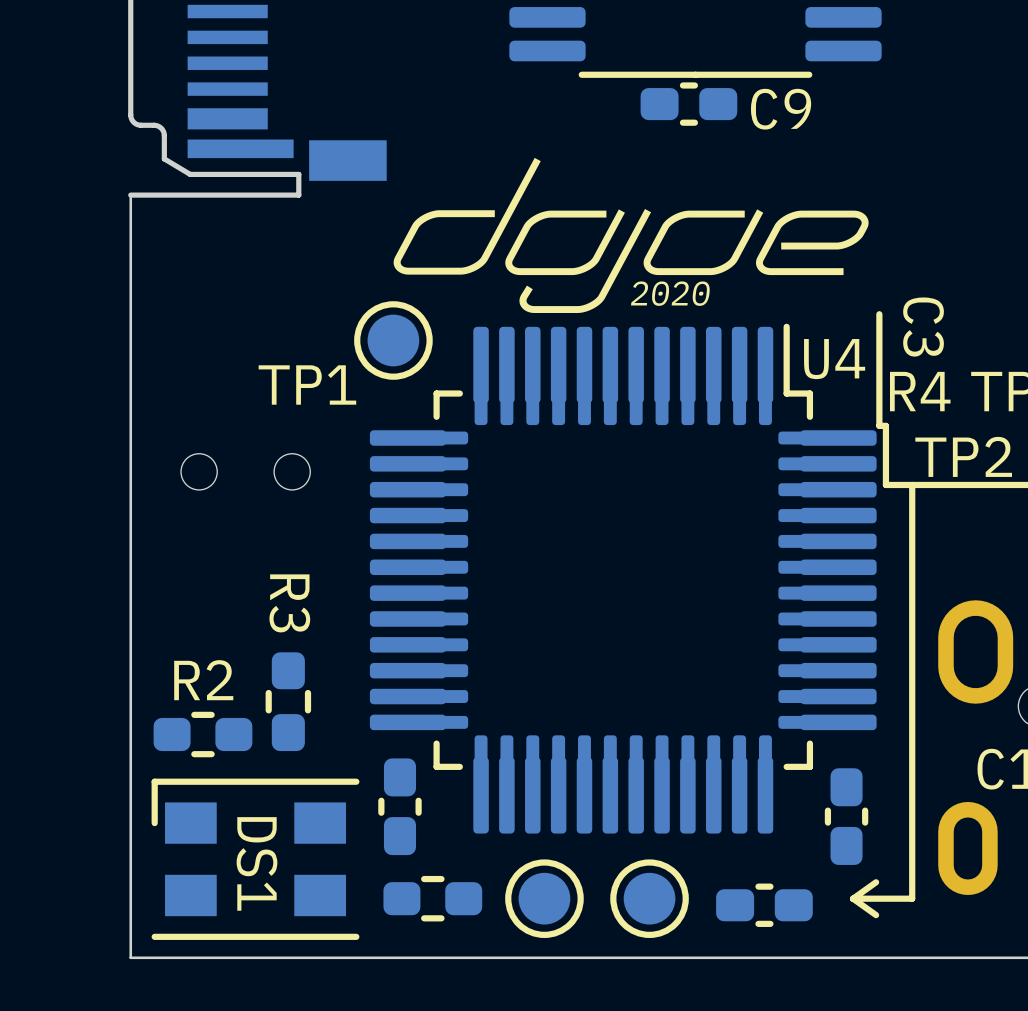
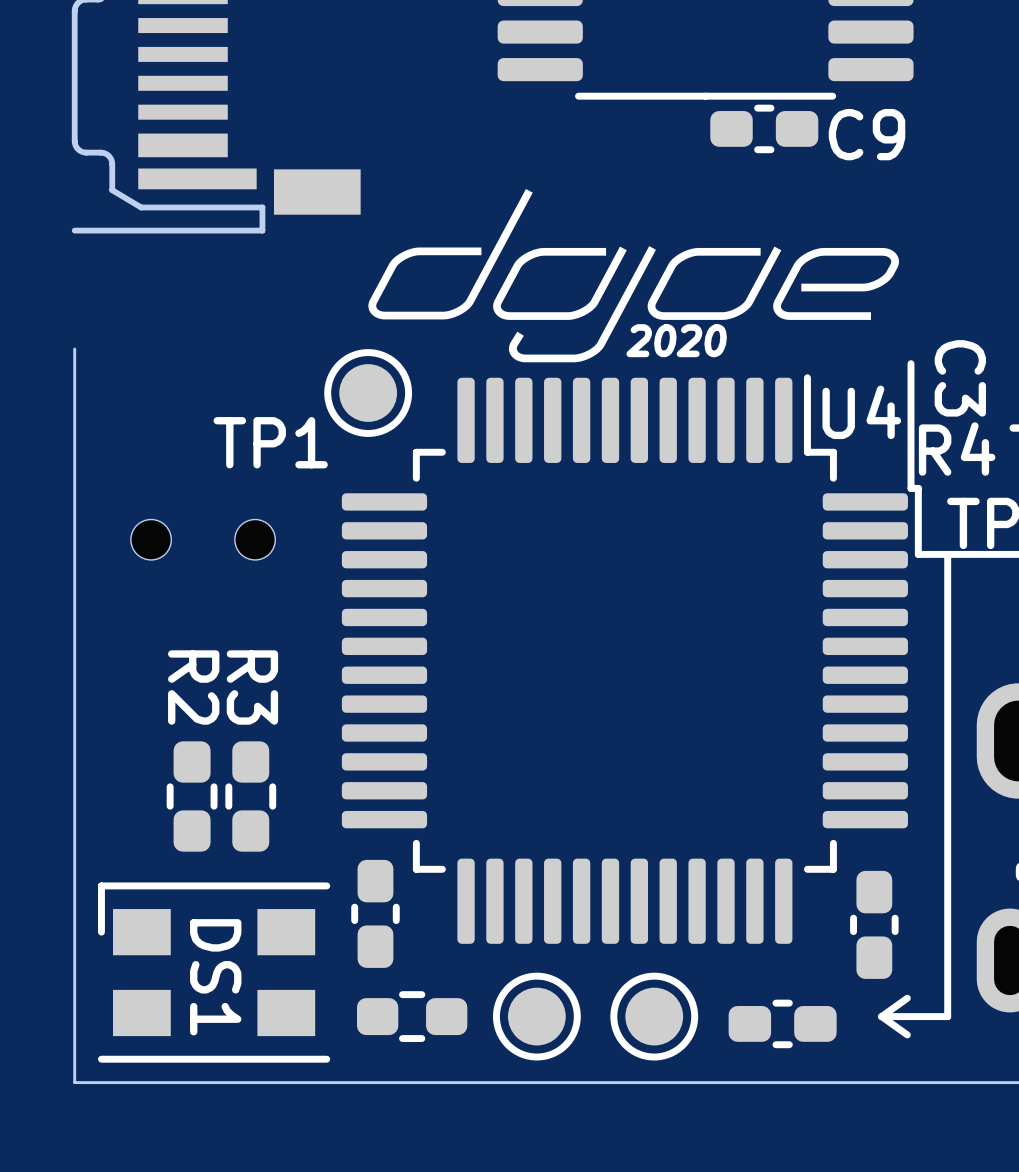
C9 position: (688, 104) -> (764, 128)
board edge: (130, 195) (130, 301) -> none
U4 footprint: [369, 323, 877, 834] -> [341, 374, 908, 944]
R2 rotation: 0° (202, 734) -> 90° clockwise (192, 796)

